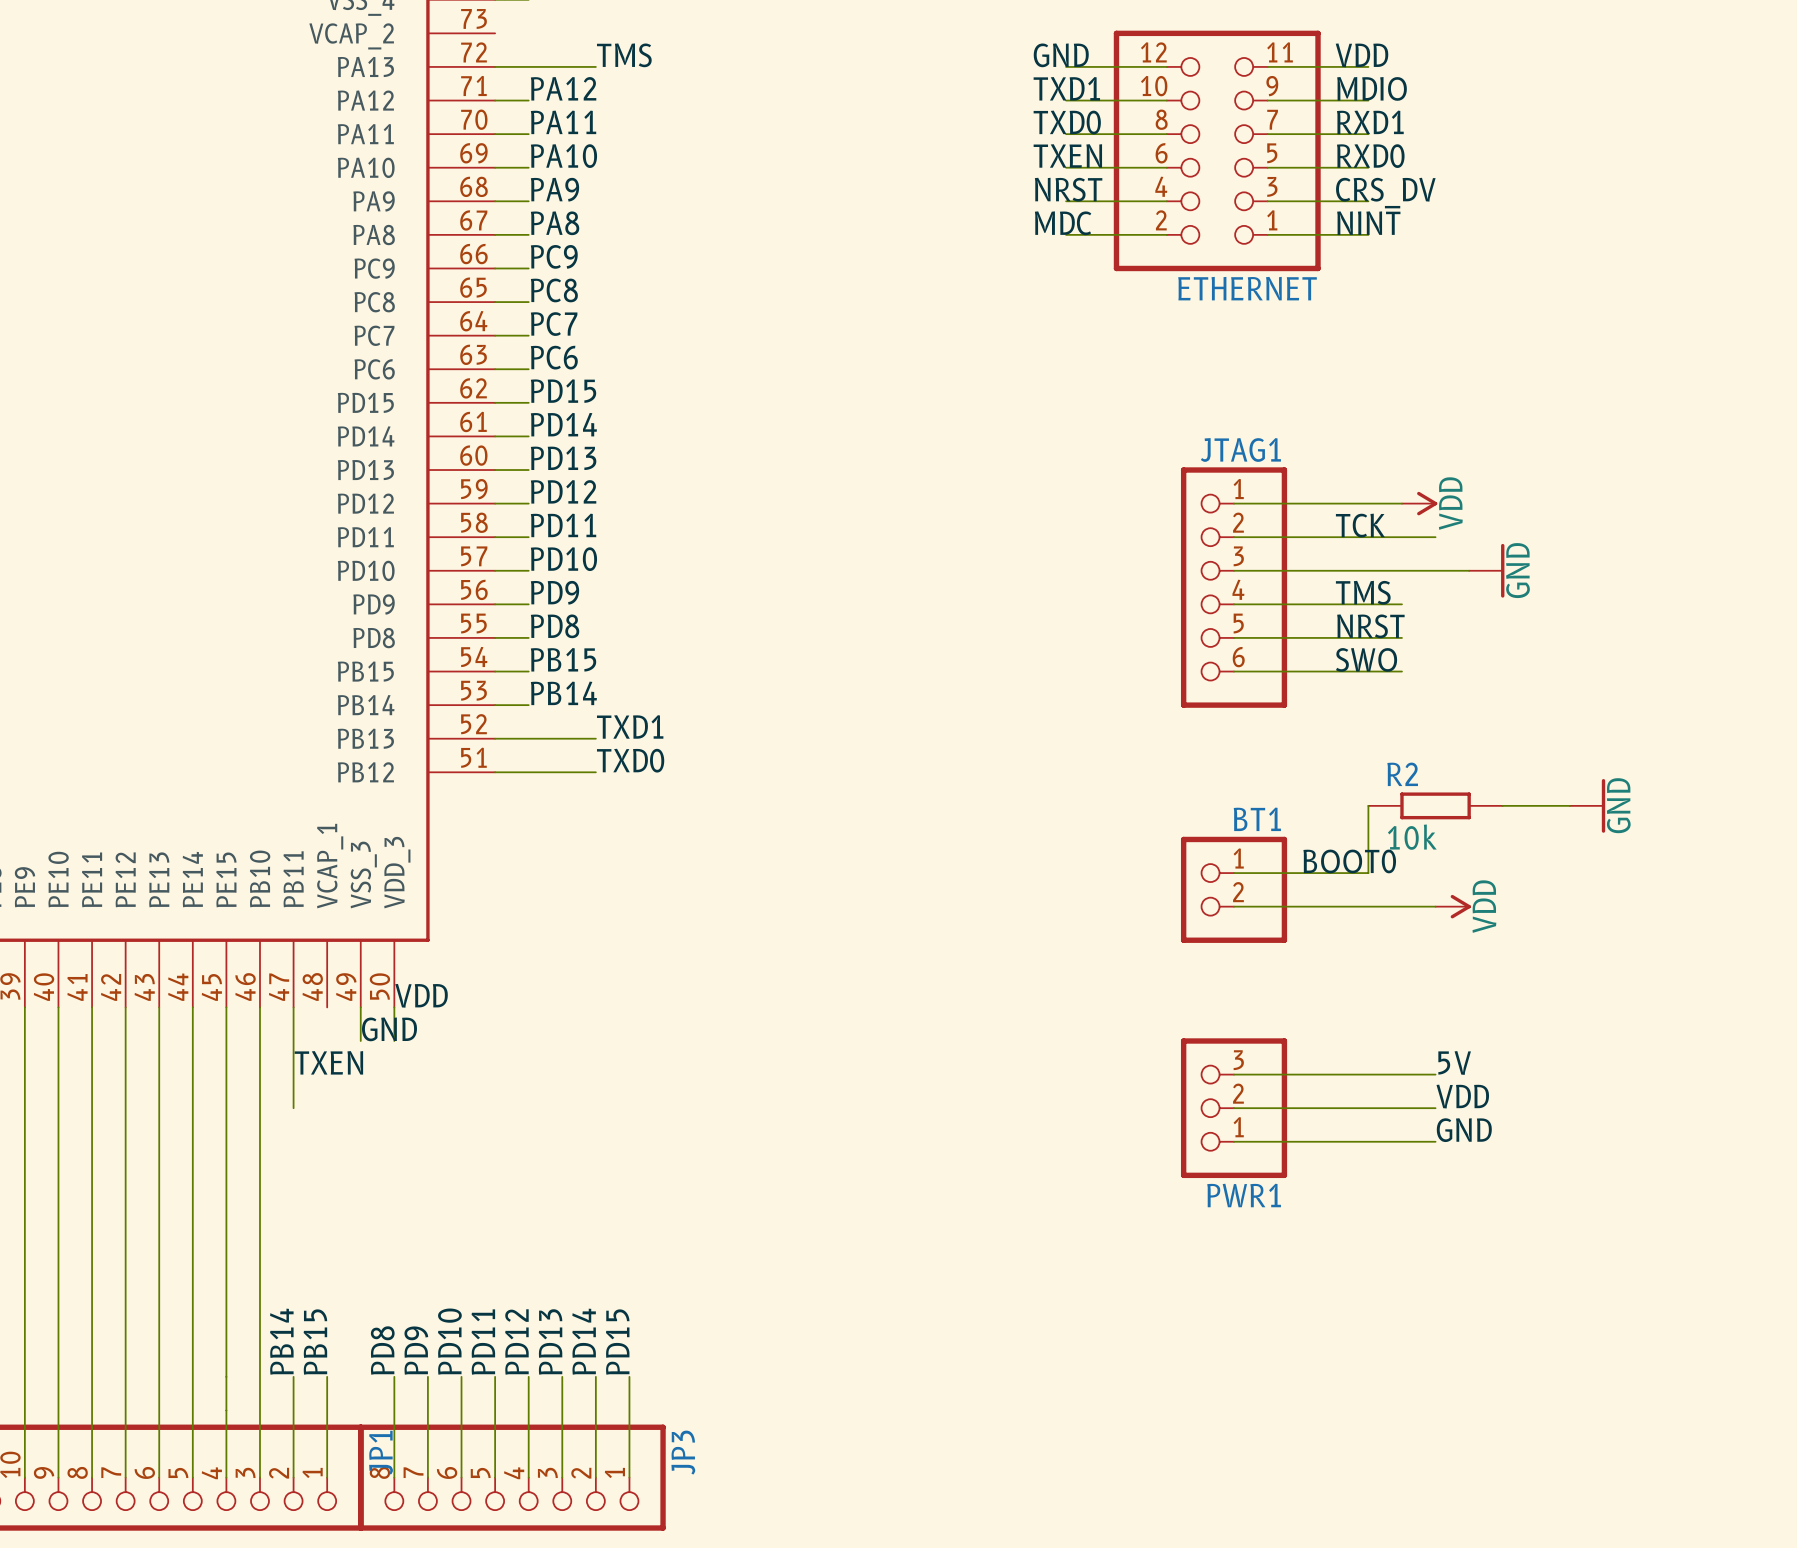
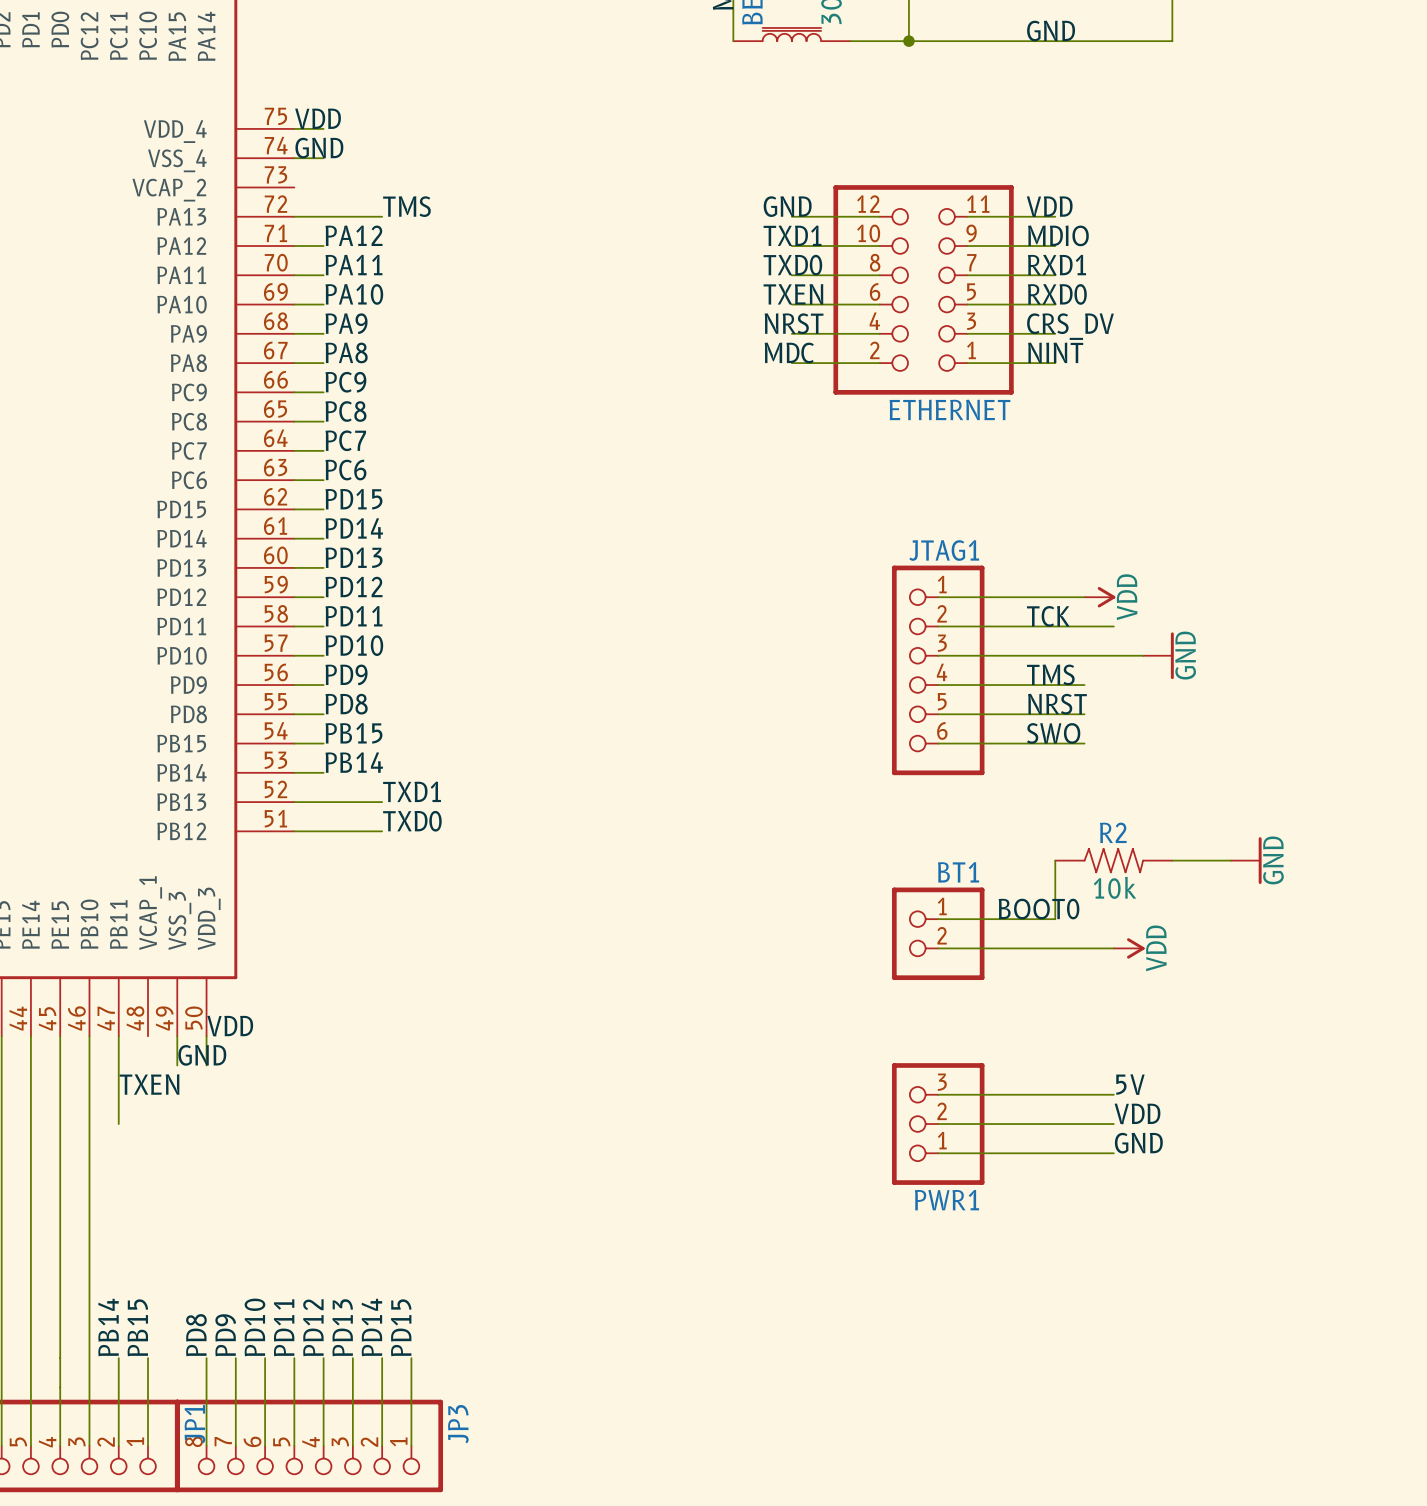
R2 name position: R2 (1402, 774) -> R2 (1113, 832)
R2 symbol: [1368, 792, 1503, 820] -> [1055, 848, 1173, 874]
R2 value position: 10k (1412, 837) -> 10k (1115, 887)

